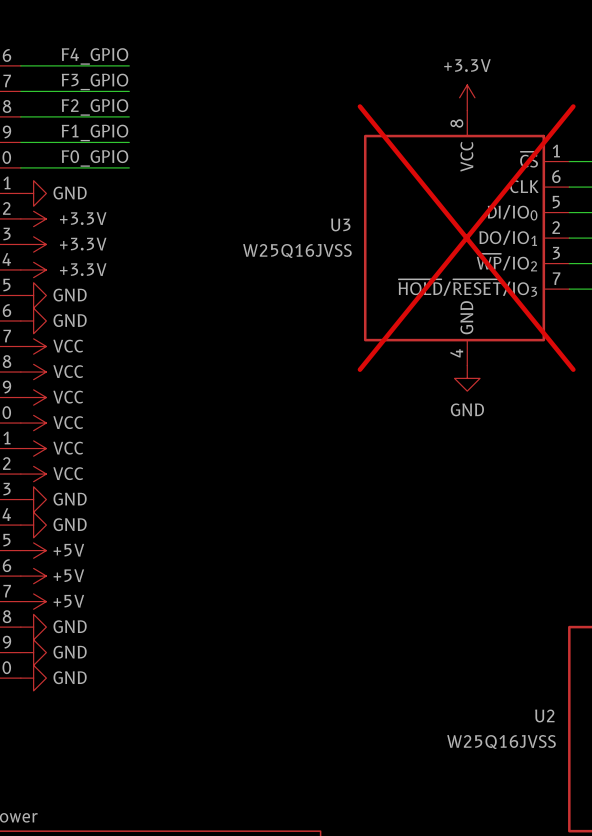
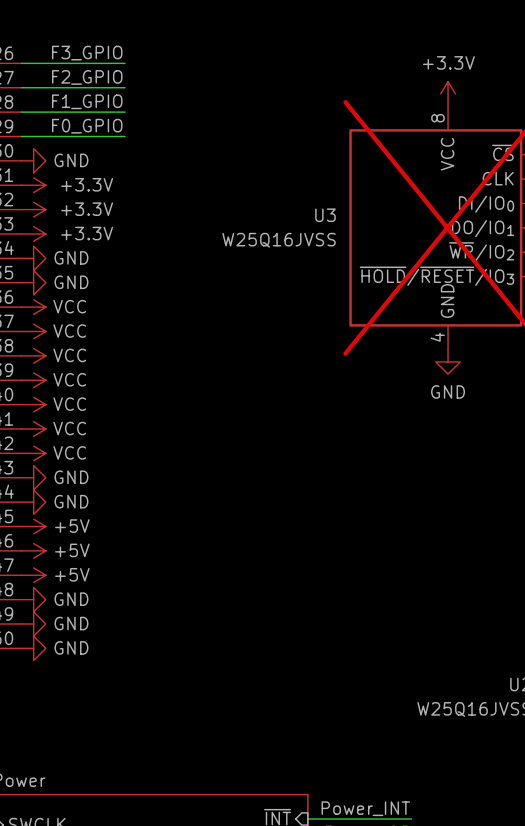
label: F4_GPIO (95, 56) -> F3_GPIO (87, 53)
label: F3_GPIO (95, 81) -> F2_GPIO (87, 77)
label: F2_GPIO (95, 107) -> F1_GPIO (87, 101)
label: F1_GPIO (95, 132) -> F0_GPIO (87, 126)
label: F0_GPIO (95, 158) -> none
wire: (20, 167) (129, 167) -> none
power symbol: none -> GND (33, 160)
power symbol: GND (33, 193) -> +3.3V (33, 185)
power symbol: +3.3V (33, 269) -> GND (33, 258)
power symbol: GND (33, 320) -> VCC (33, 307)

